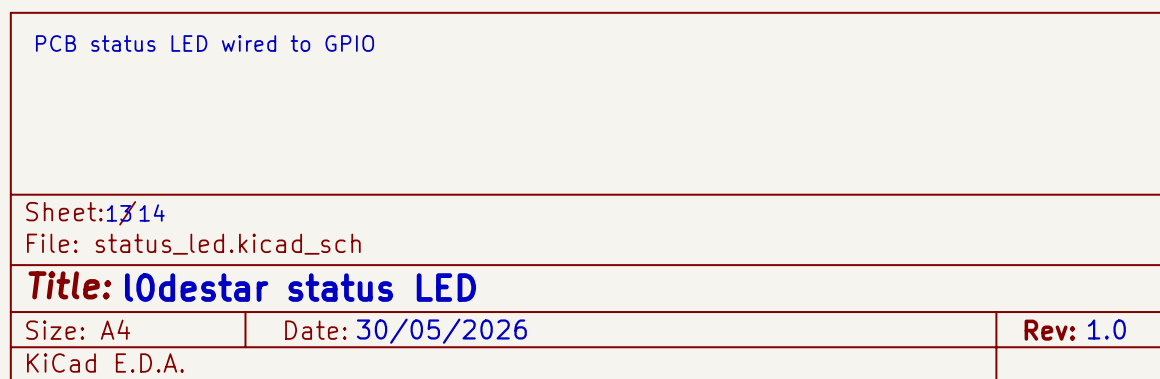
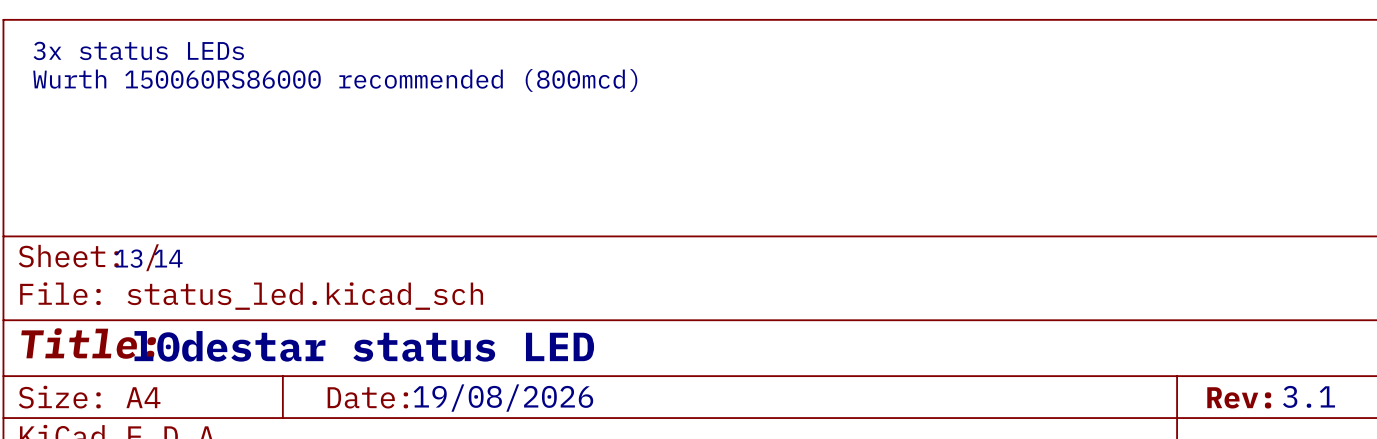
text: PCB status LED wired to GPIO (205, 43) -> 3x status LEDs (138, 50)
text: none -> Wurth 150060RS86000 recommended (800mcd) (335, 80)
text: 1.0 (1106, 329) -> 3.1 (1309, 396)
text: 30/05/2026 (441, 331) -> 19/08/2026 (503, 398)

